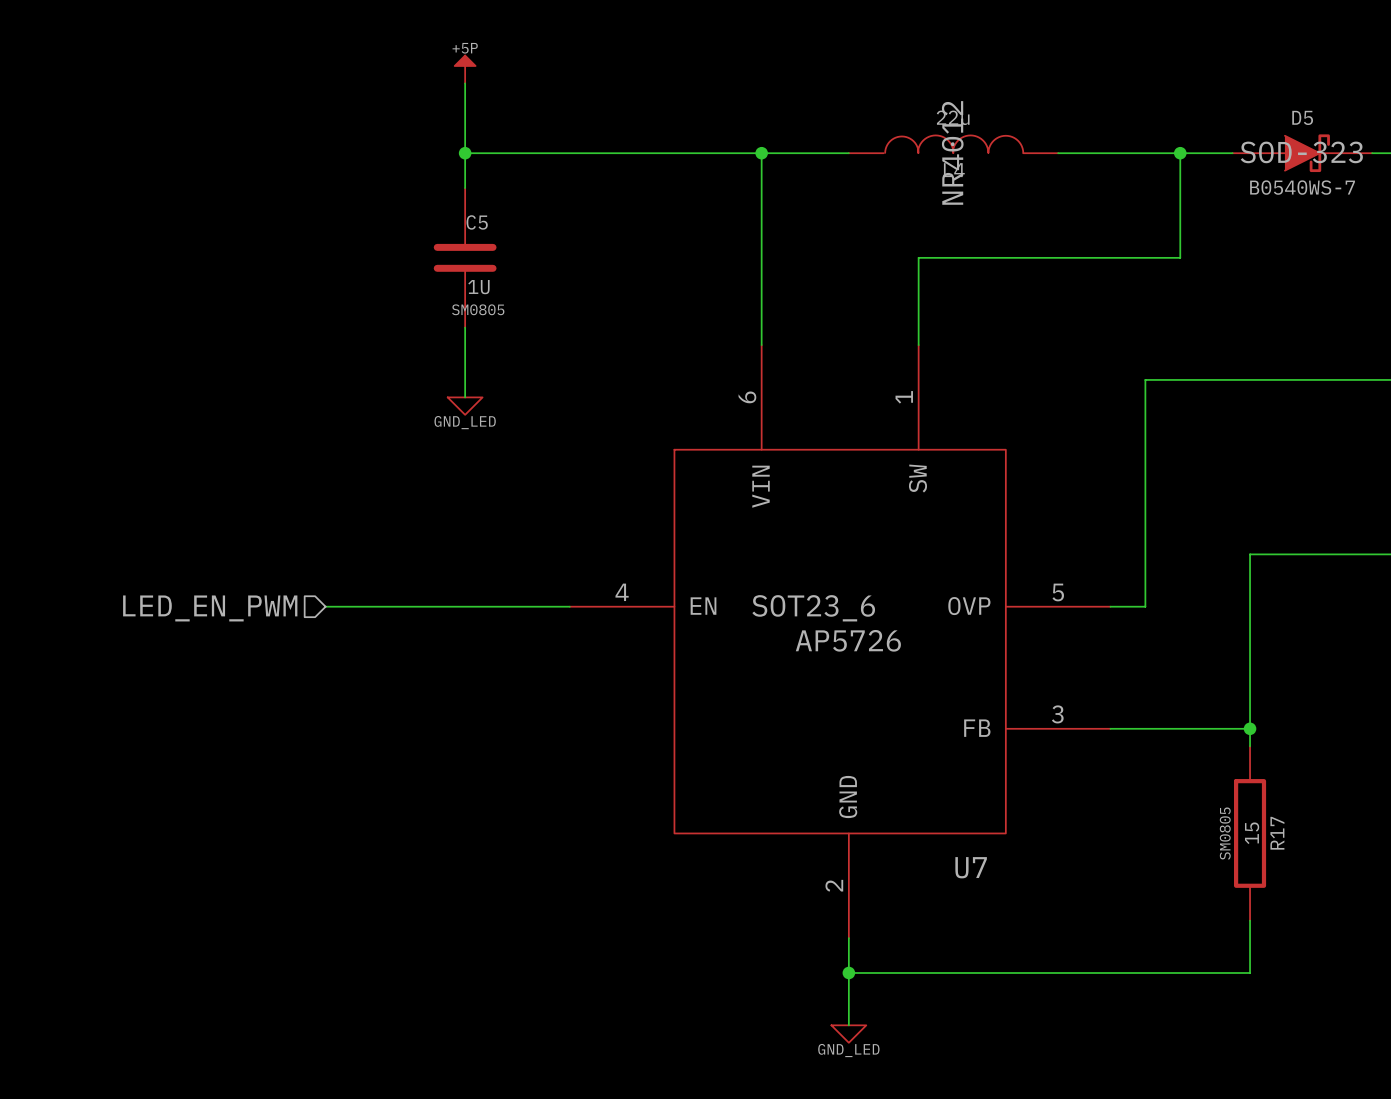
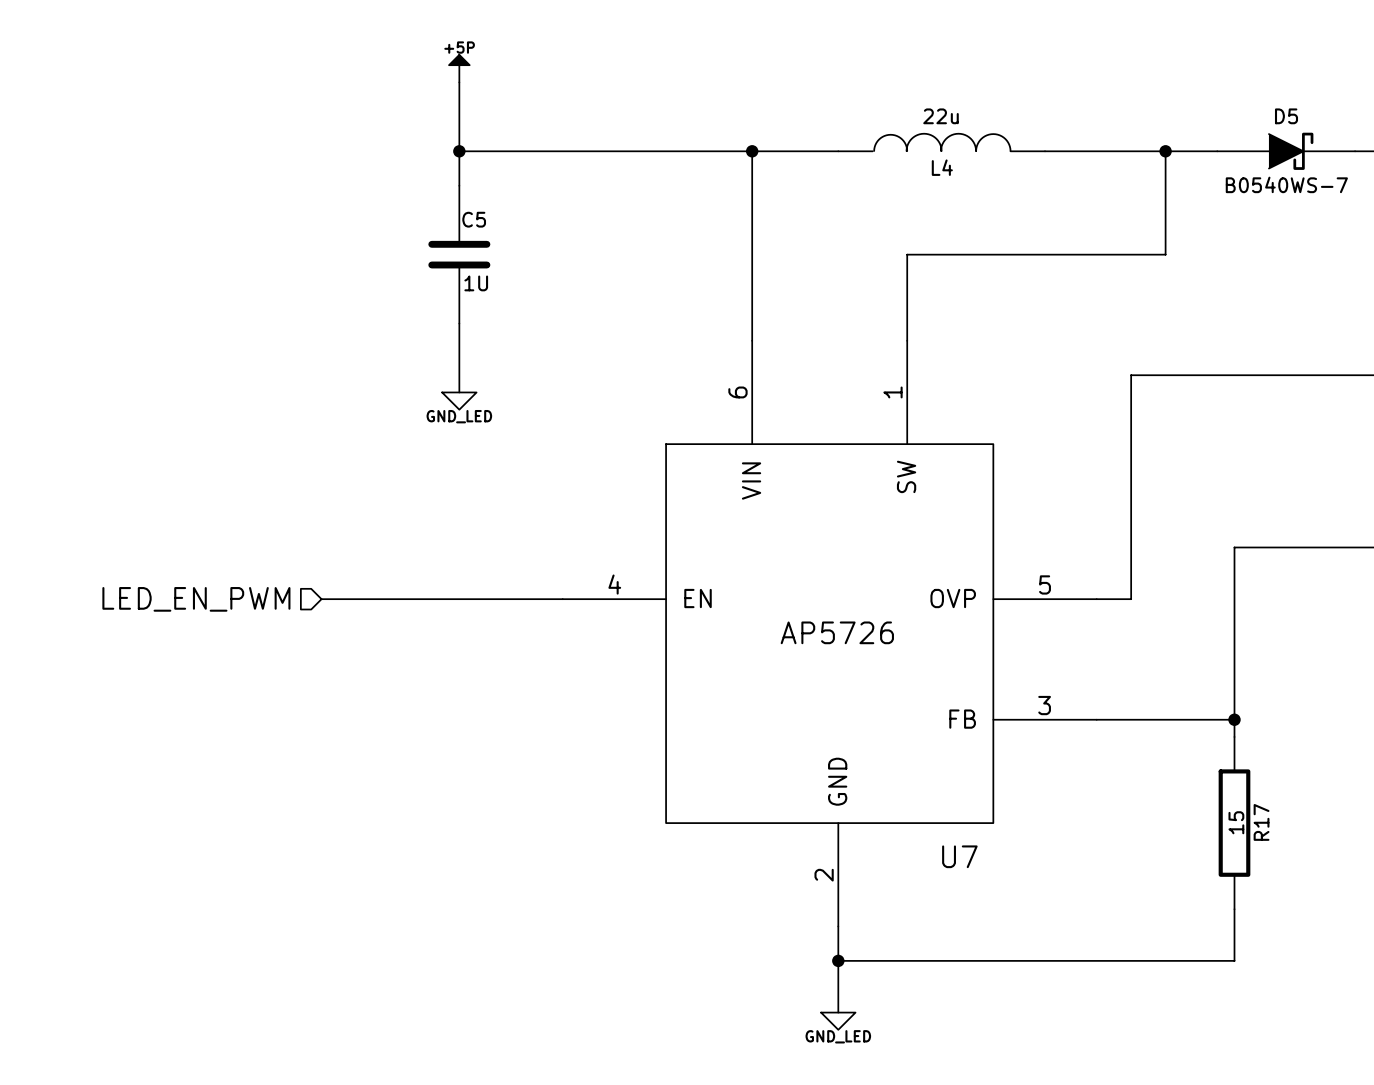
L4 text: NR4012 (952, 152) -> none
D5 text: SOD-323 (1301, 152) -> none
C5 text: SM0805 (478, 309) -> none
U7 text: SOT23_6 (813, 608) -> none
R17 text: SM0805 (1225, 833) -> none

